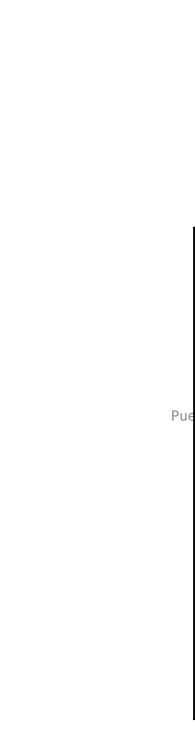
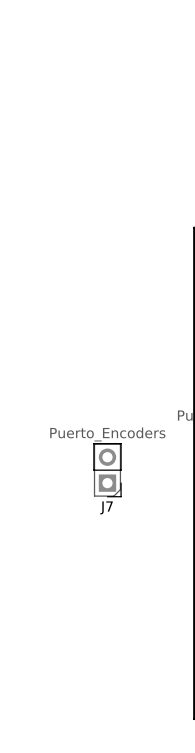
J7: none -> Puerto_Encoders (107, 470)

